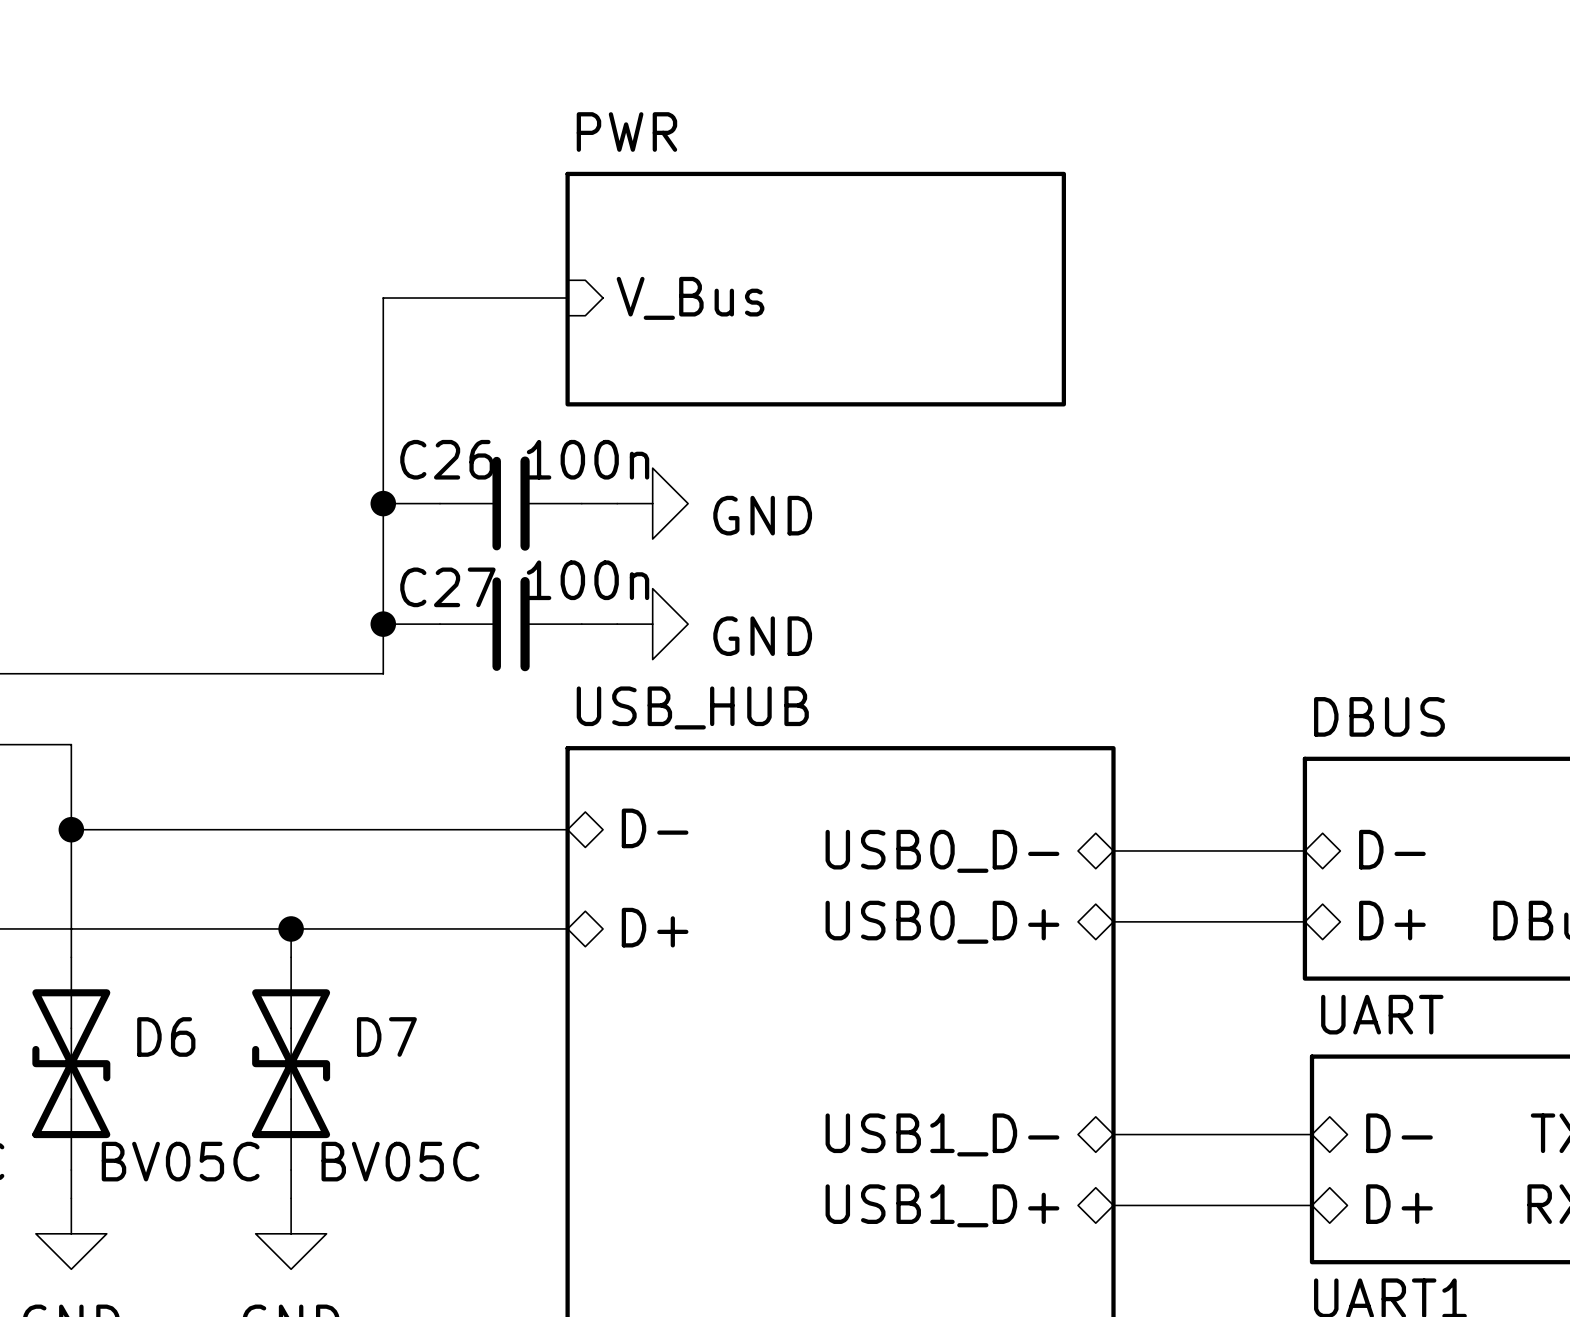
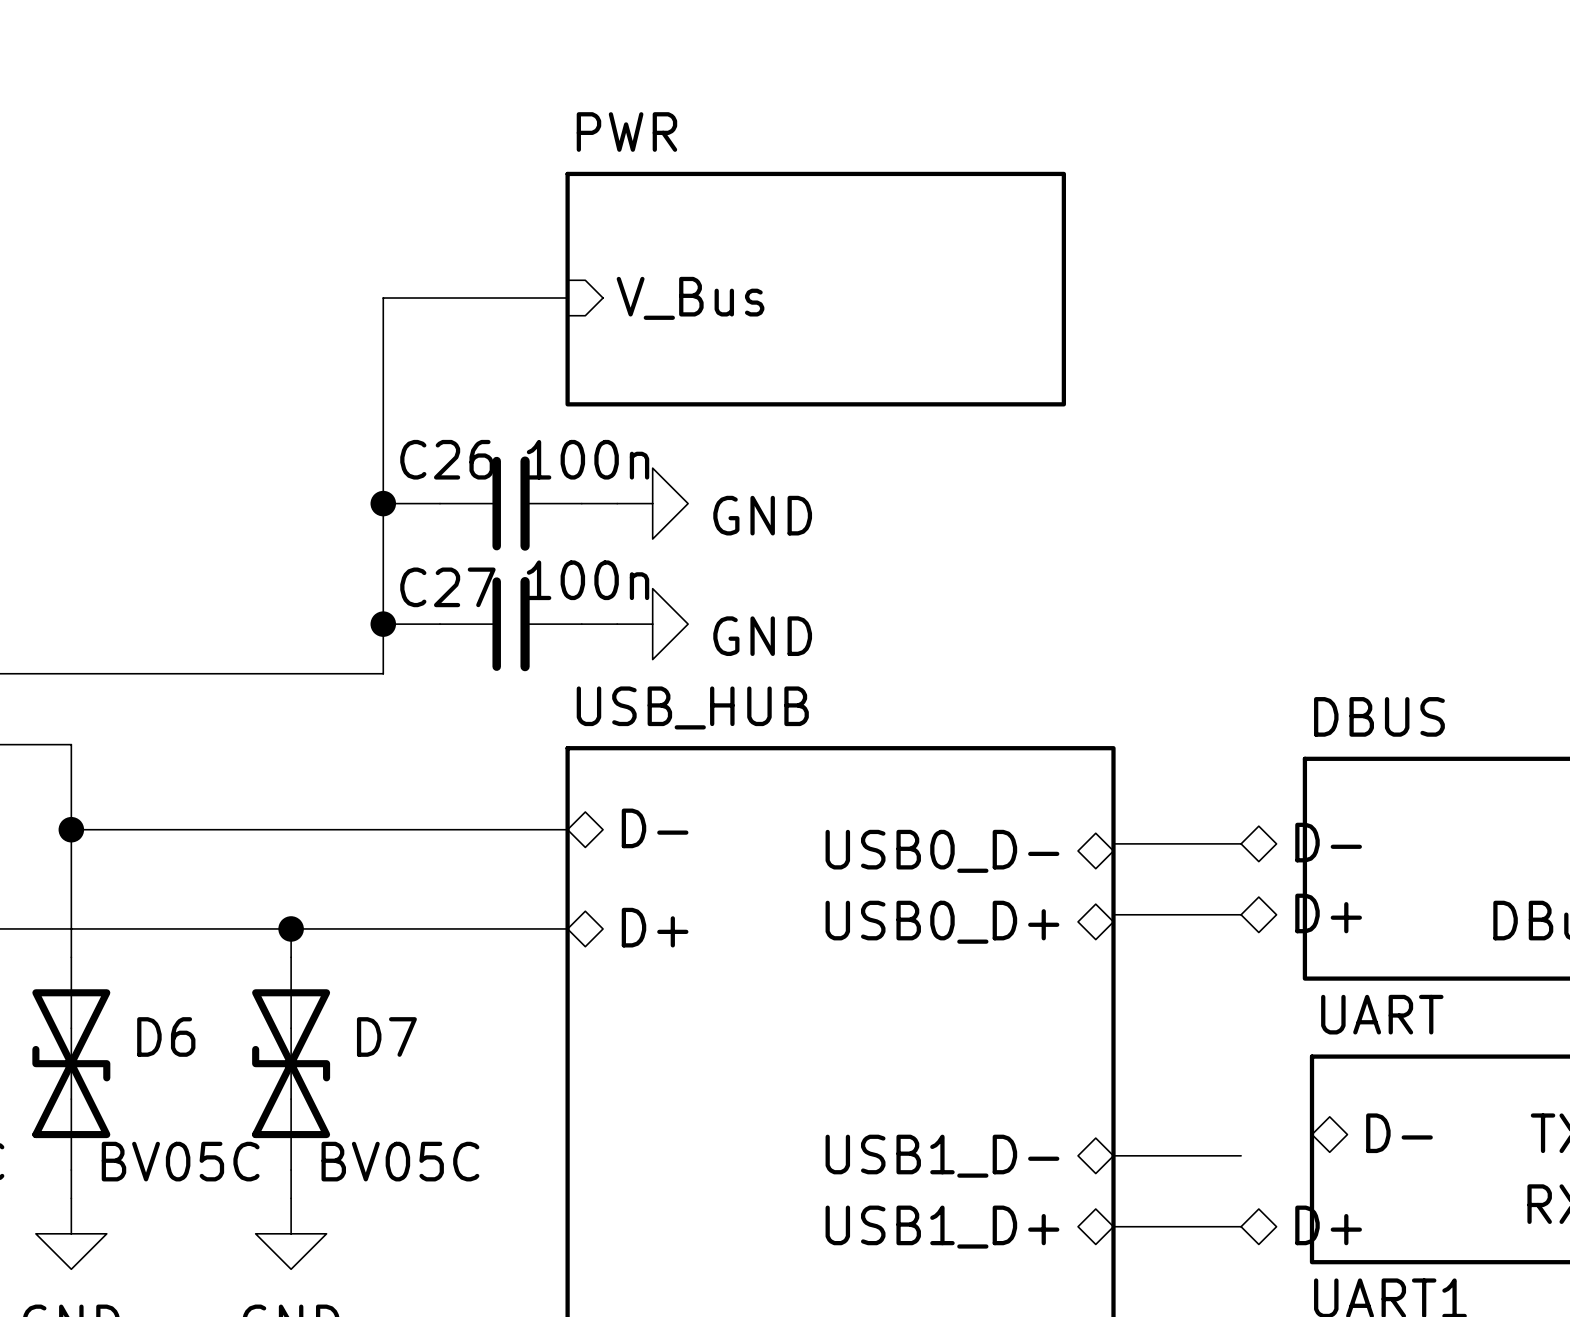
wire: none -> (1113, 843) (1241, 843)
sheet pin position: D- (1392, 849) -> D- (1328, 842)
wire: (1113, 850) (1304, 850) -> none
wire: none -> (1113, 914) (1241, 914)
sheet pin position: D+ (1392, 920) -> D+ (1328, 913)
wire: (1113, 921) (1304, 921) -> none
sheet pin position: USB1_D- (942, 1134) -> USB1_D- (942, 1156)
wire: (1113, 1134) (1312, 1134) -> none
wire: none -> (1113, 1155) (1241, 1155)
sheet pin position: D+ (1399, 1204) -> D+ (1328, 1225)
sheet pin position: USB1_D+ (942, 1205) -> USB1_D+ (942, 1227)
wire: (1113, 1205) (1312, 1205) -> none
wire: none -> (1113, 1226) (1241, 1226)

